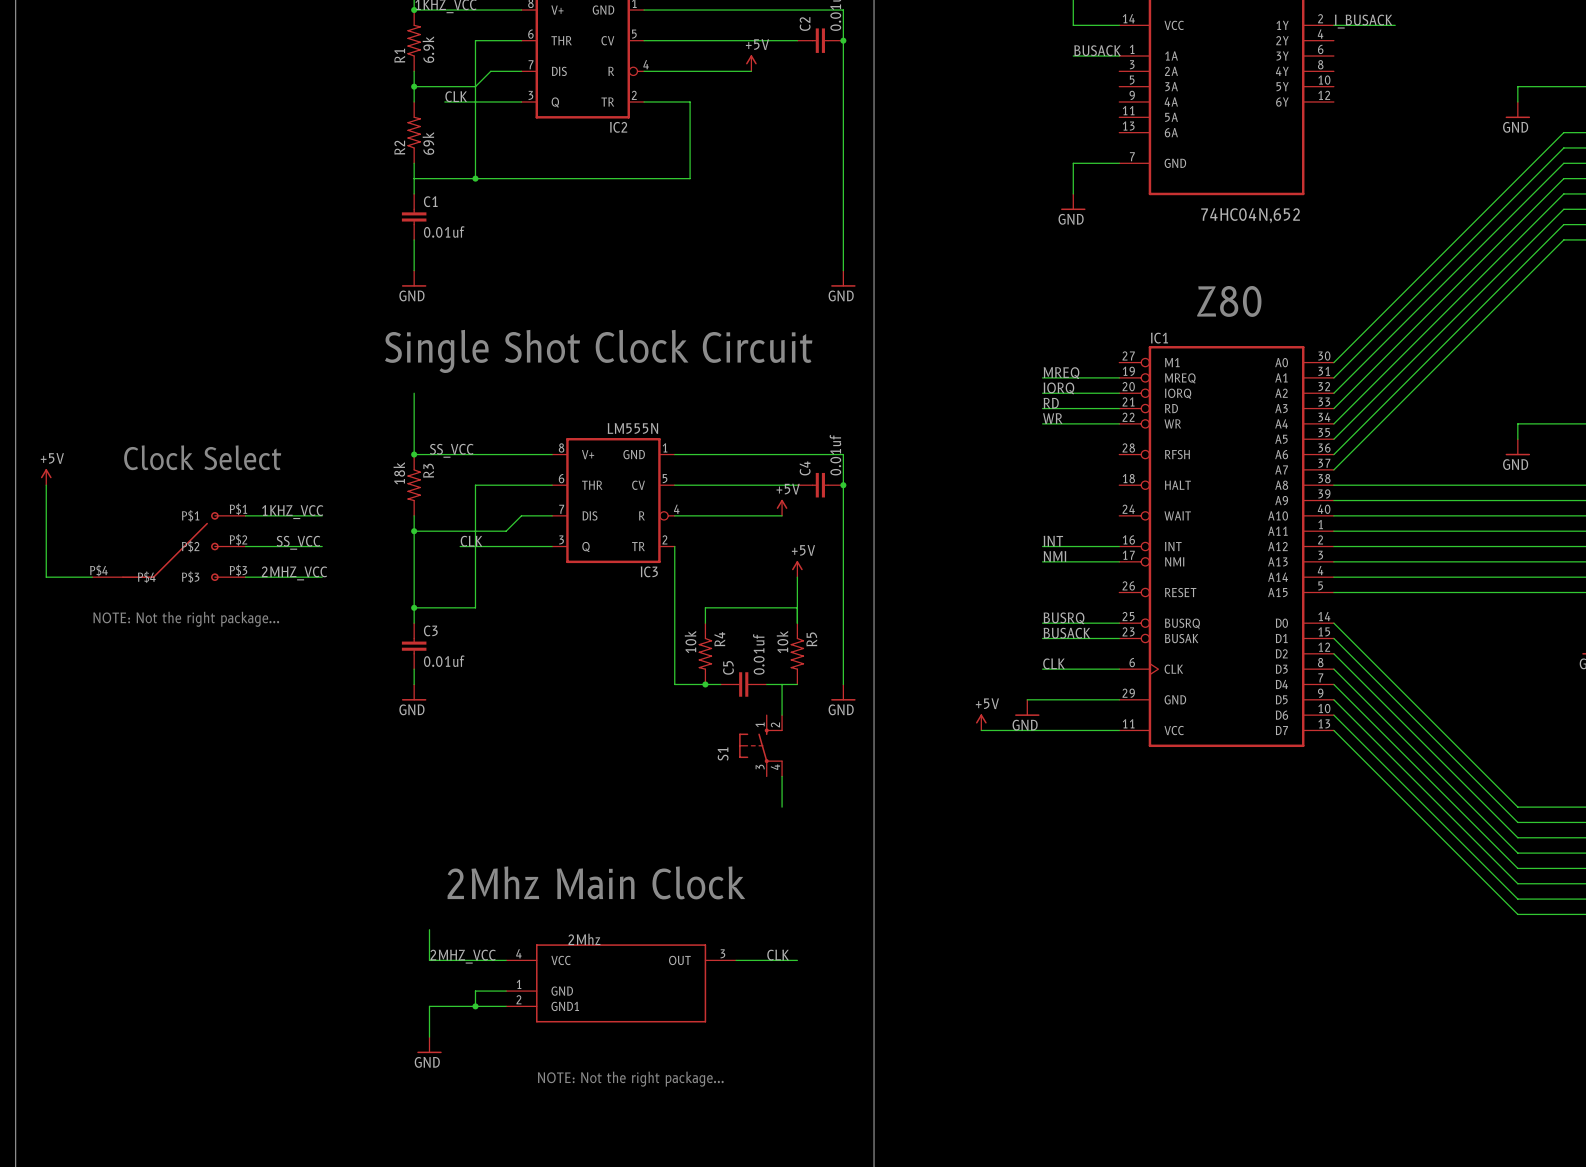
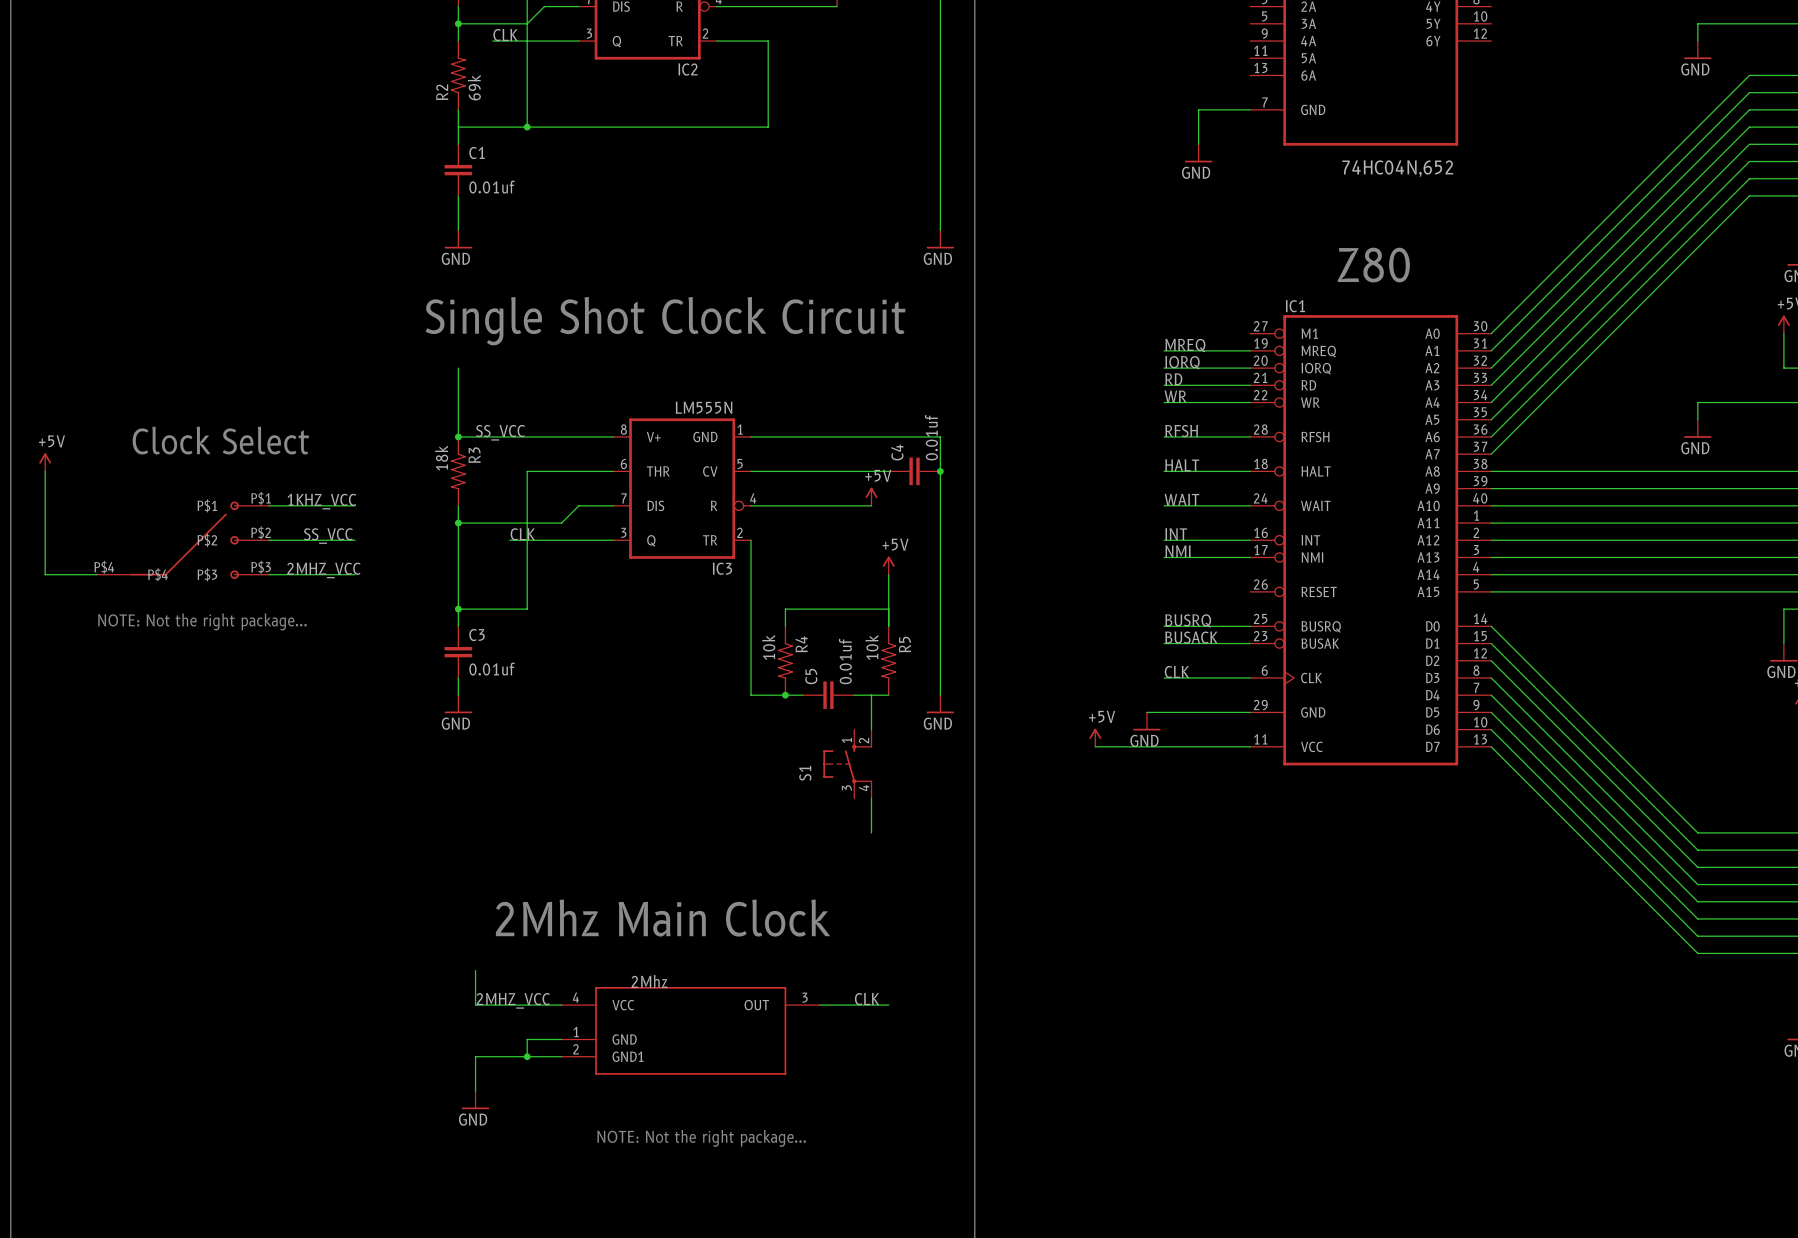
label: none -> RFSH (1181, 431)
wire: none -> (1164, 436) (1250, 436)
label: none -> HALT (1182, 465)
wire: none -> (1164, 471) (1250, 471)
label: none -> WAIT (1181, 499)
wire: none -> (1164, 505) (1250, 505)

